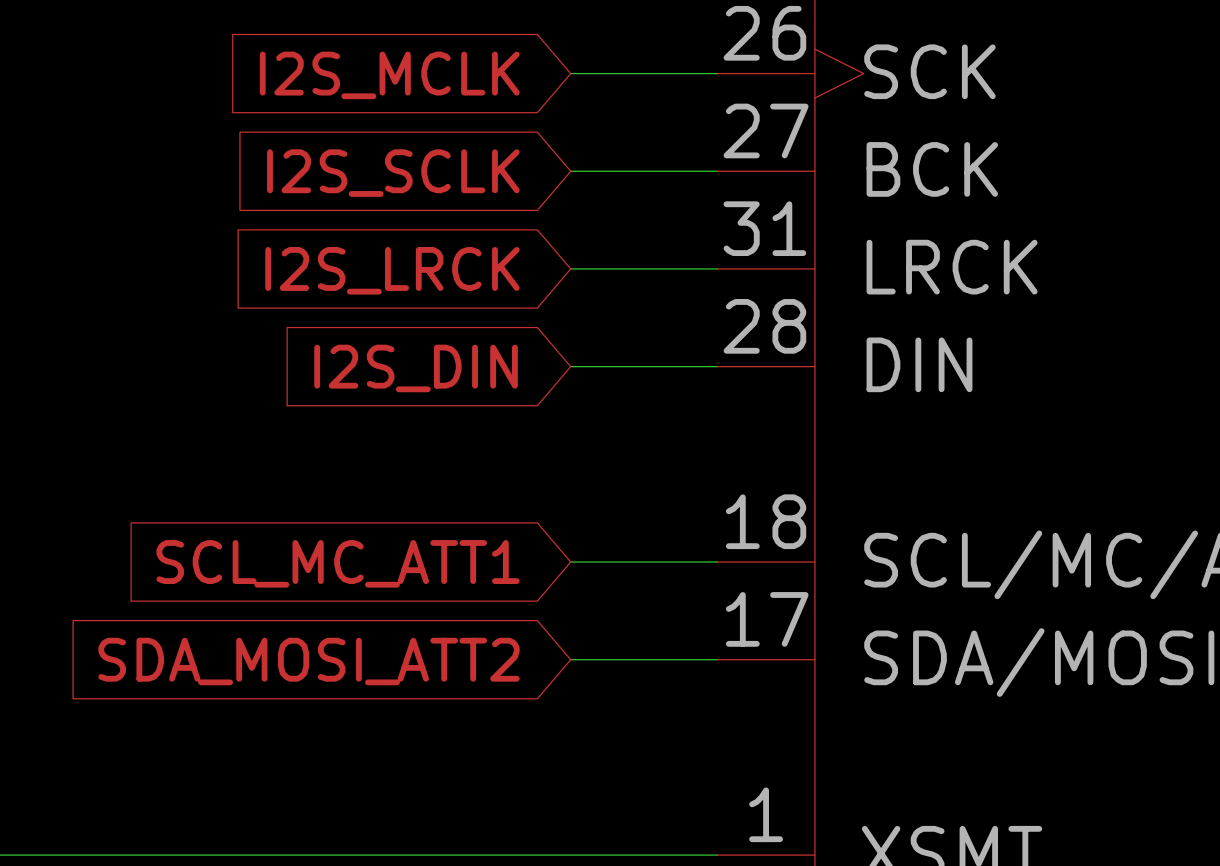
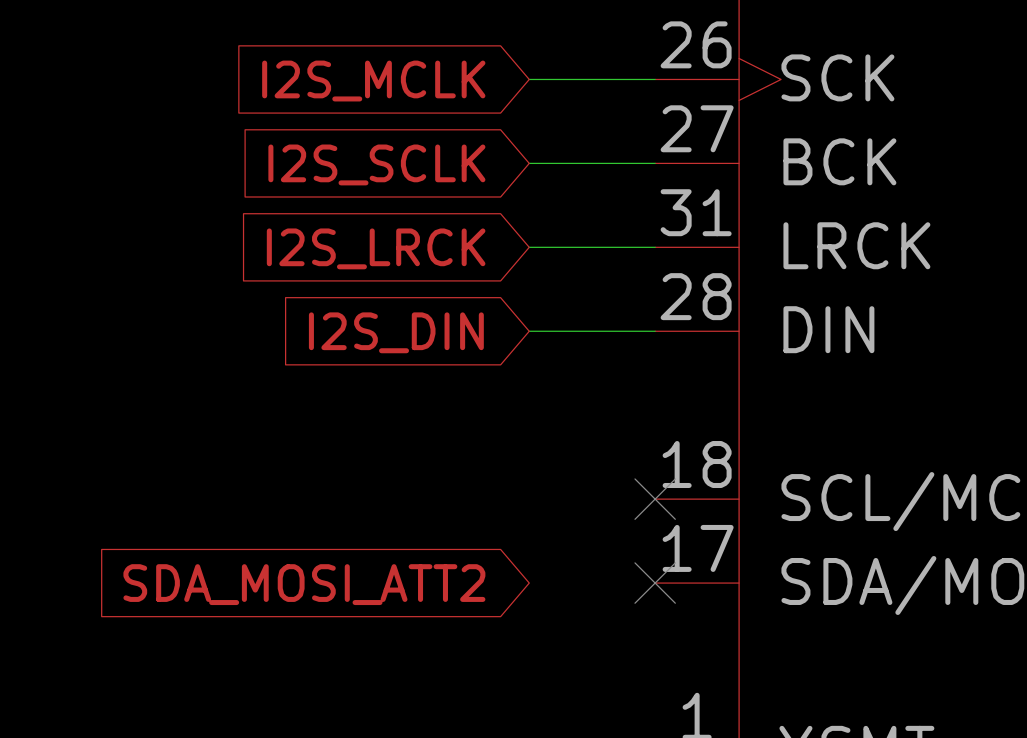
wire: (570, 562) (717, 562) -> none
no-connect mark: none -> (655, 499)
global label: SCL_MC_ATT1 (338, 563) -> none
wire: (570, 659) (717, 659) -> none
no-connect mark: none -> (655, 583)

